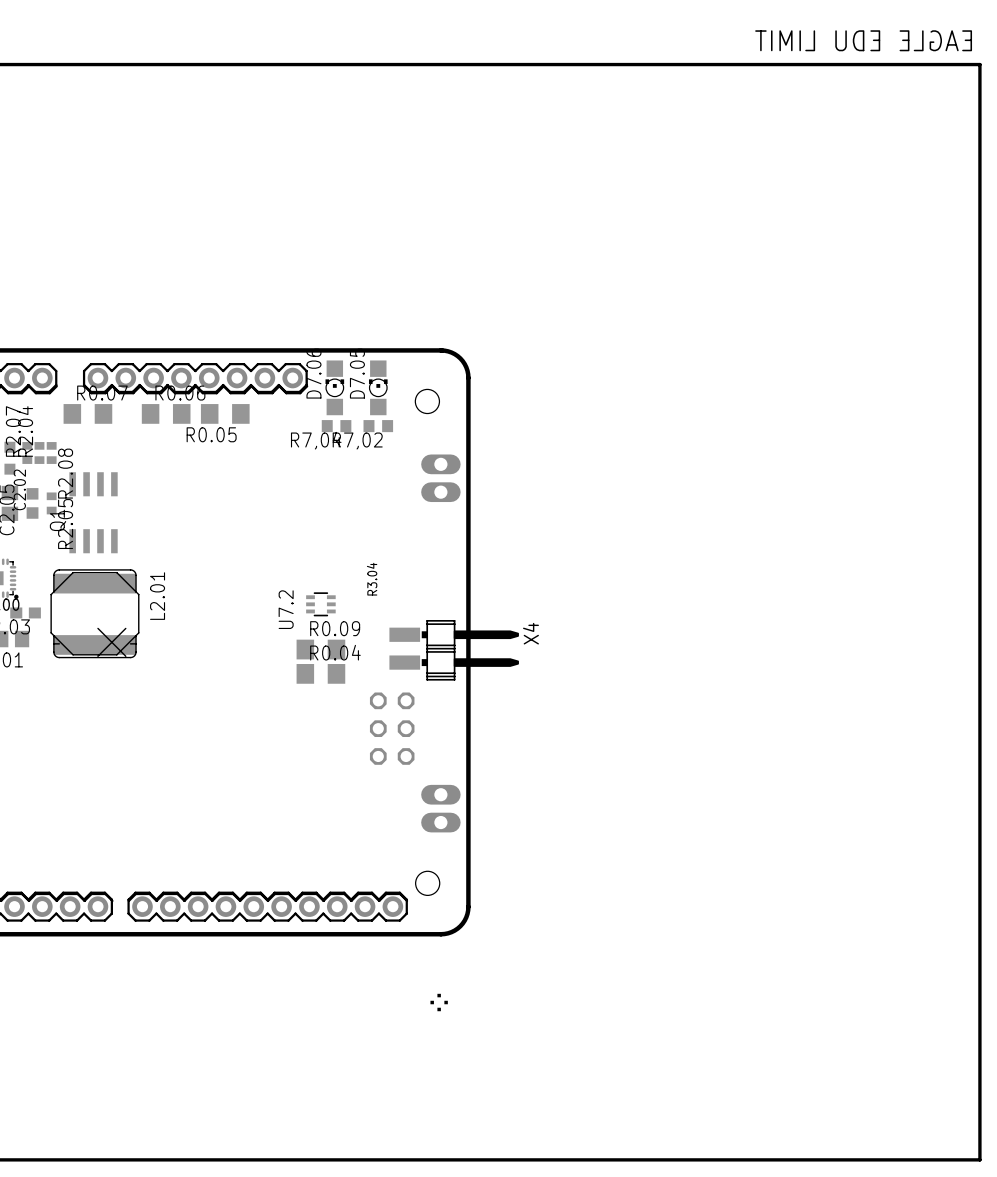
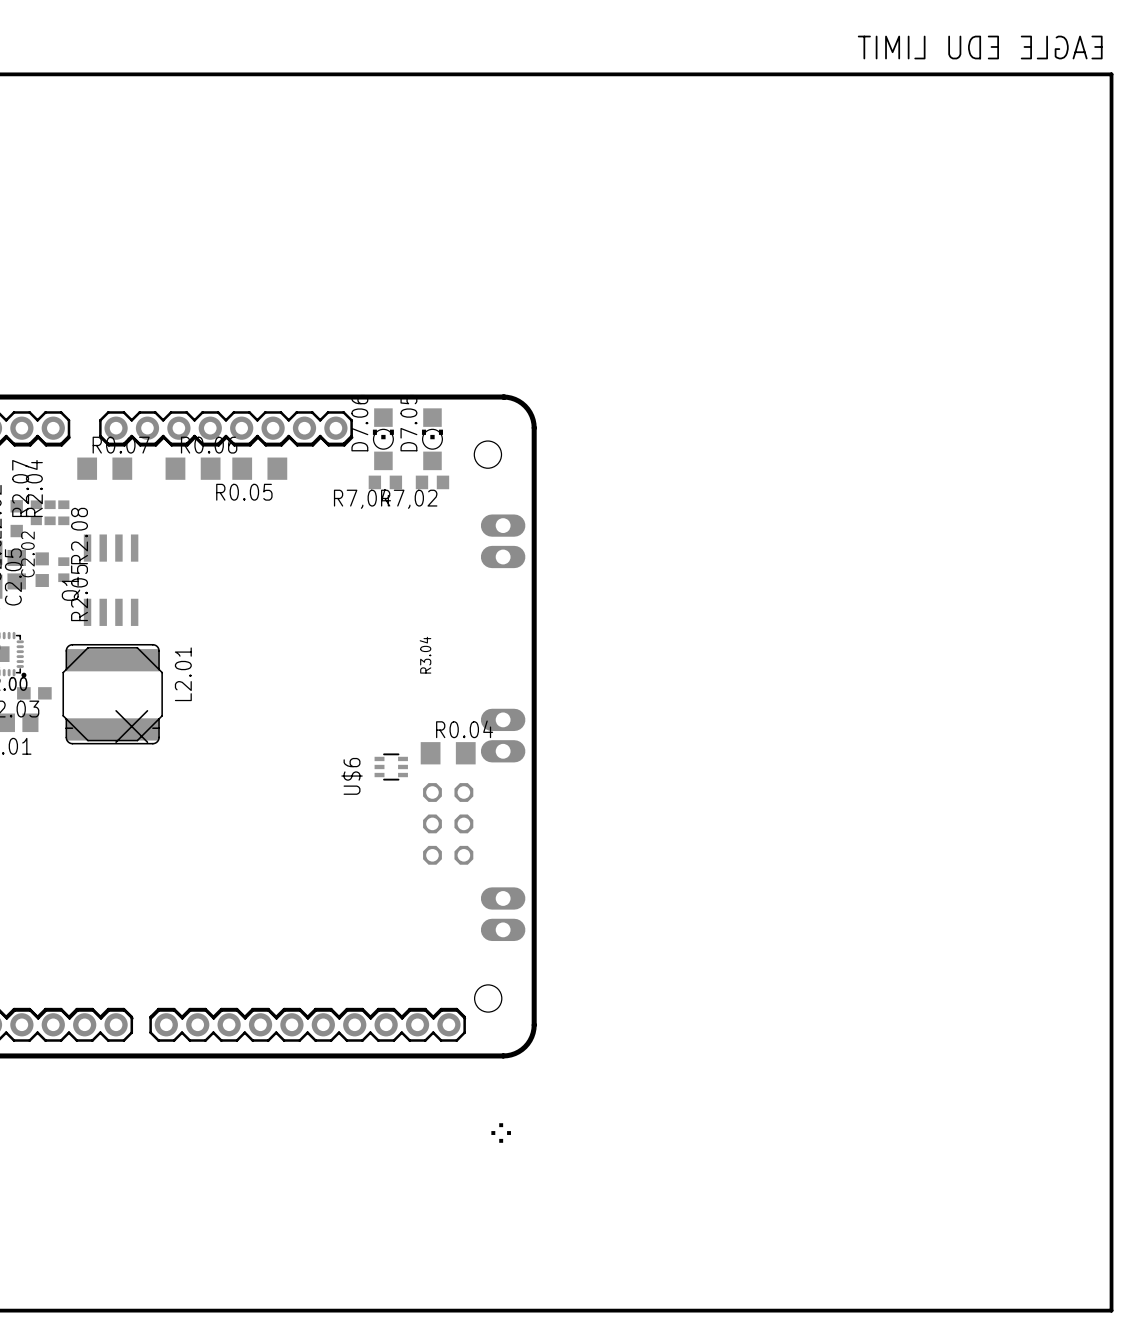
U7.2: (320, 604) -> none
R0.09: (320, 649) -> none
part: none -> (503, 735)
X4: (454, 650) -> none
R0.04 position: (320, 673) -> (448, 753)
U$6: none -> (391, 766)

